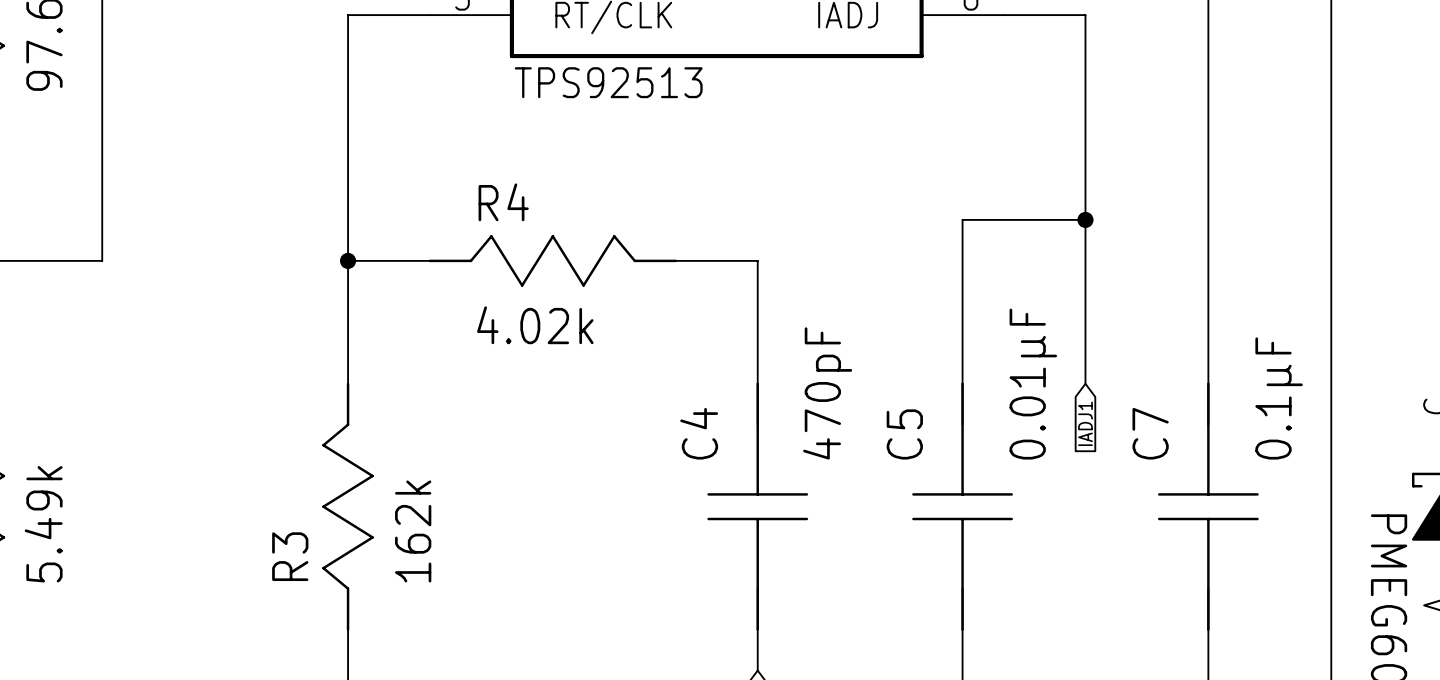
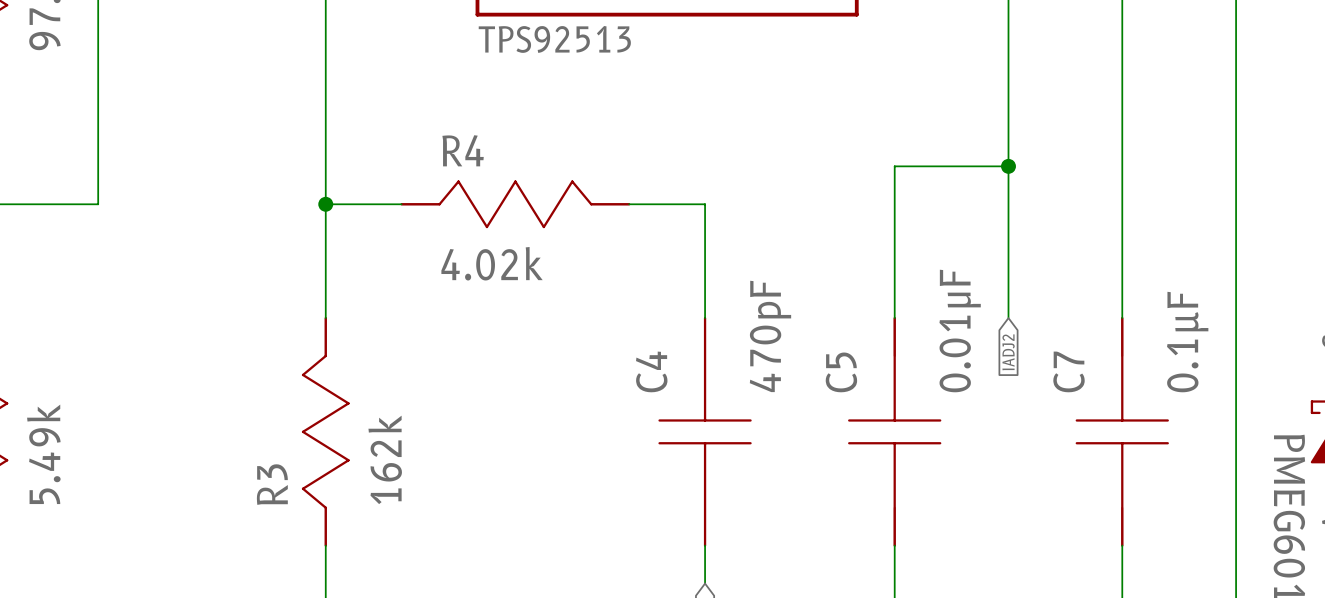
global label: IADJ1 (1085, 423) -> IADJ2 (1008, 352)

